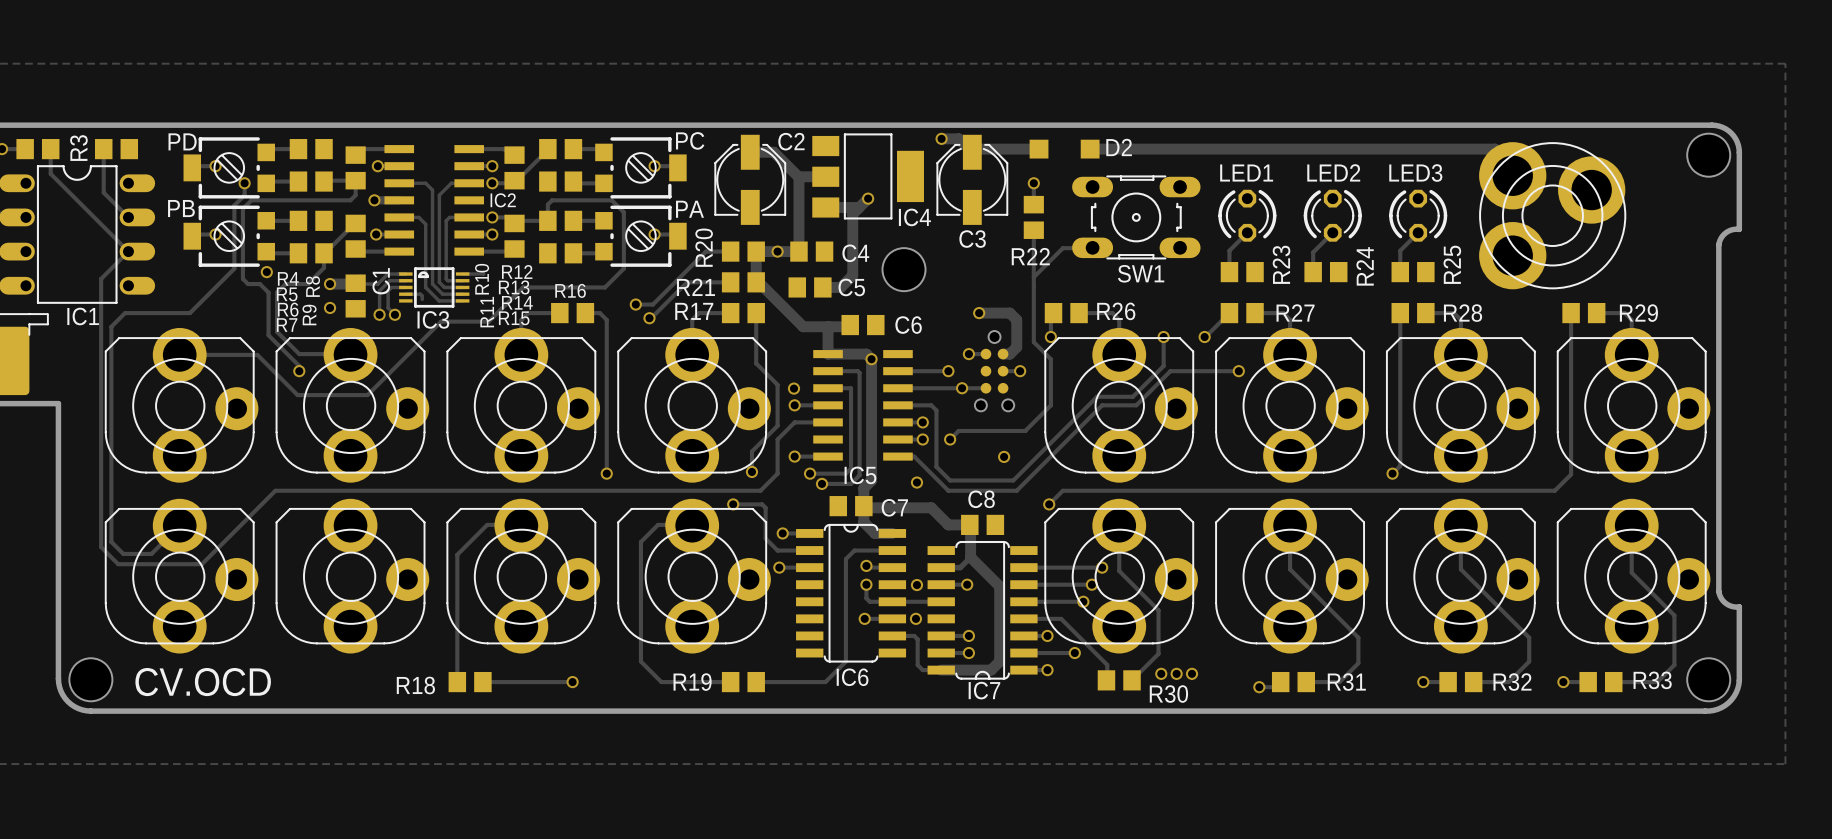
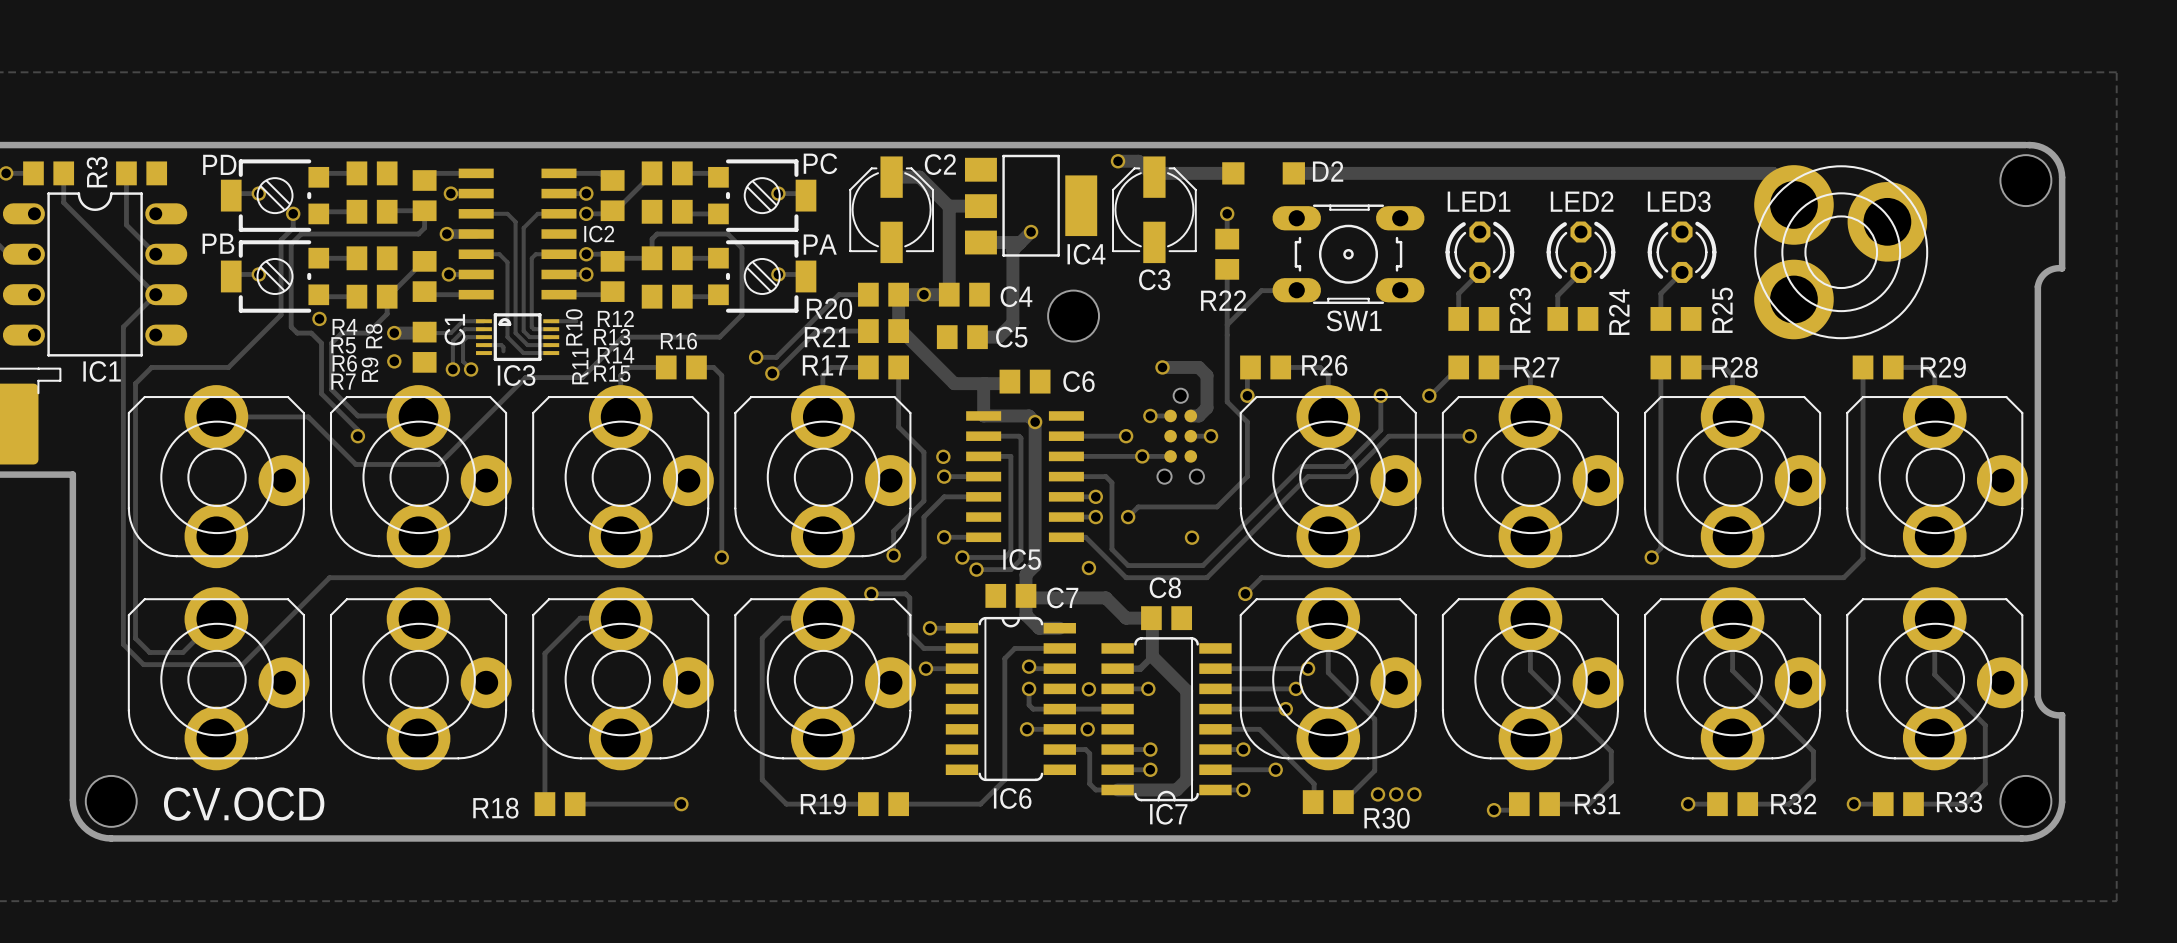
R20 name rotation: 0° (704, 247) -> 90° clockwise (829, 308)

